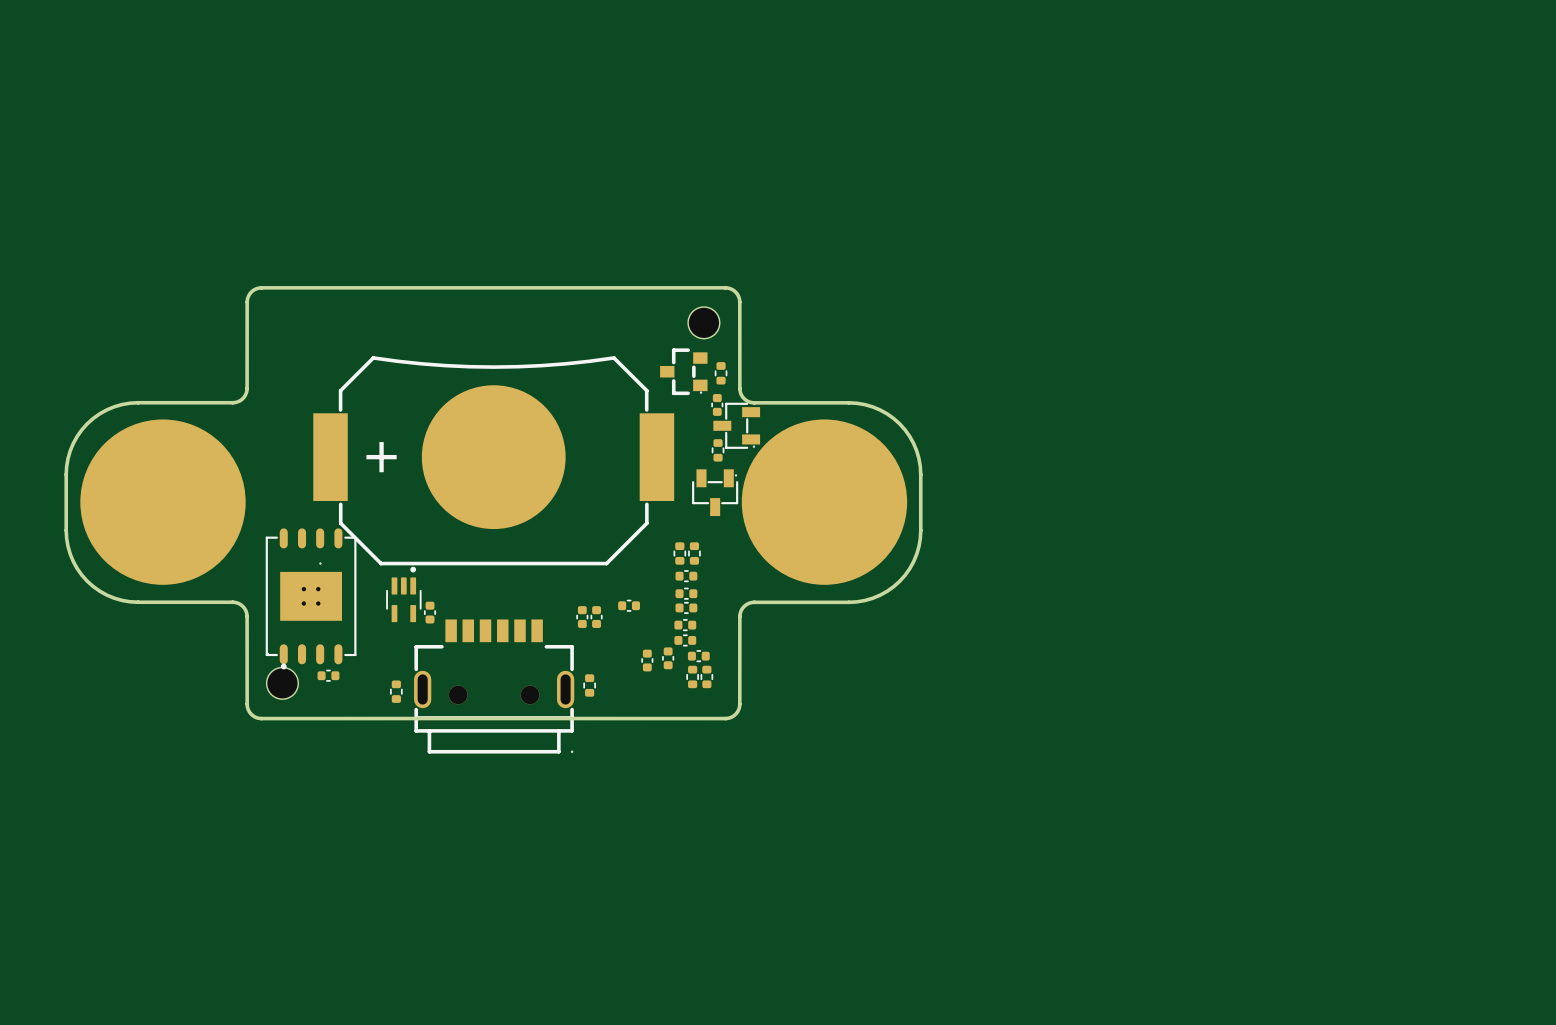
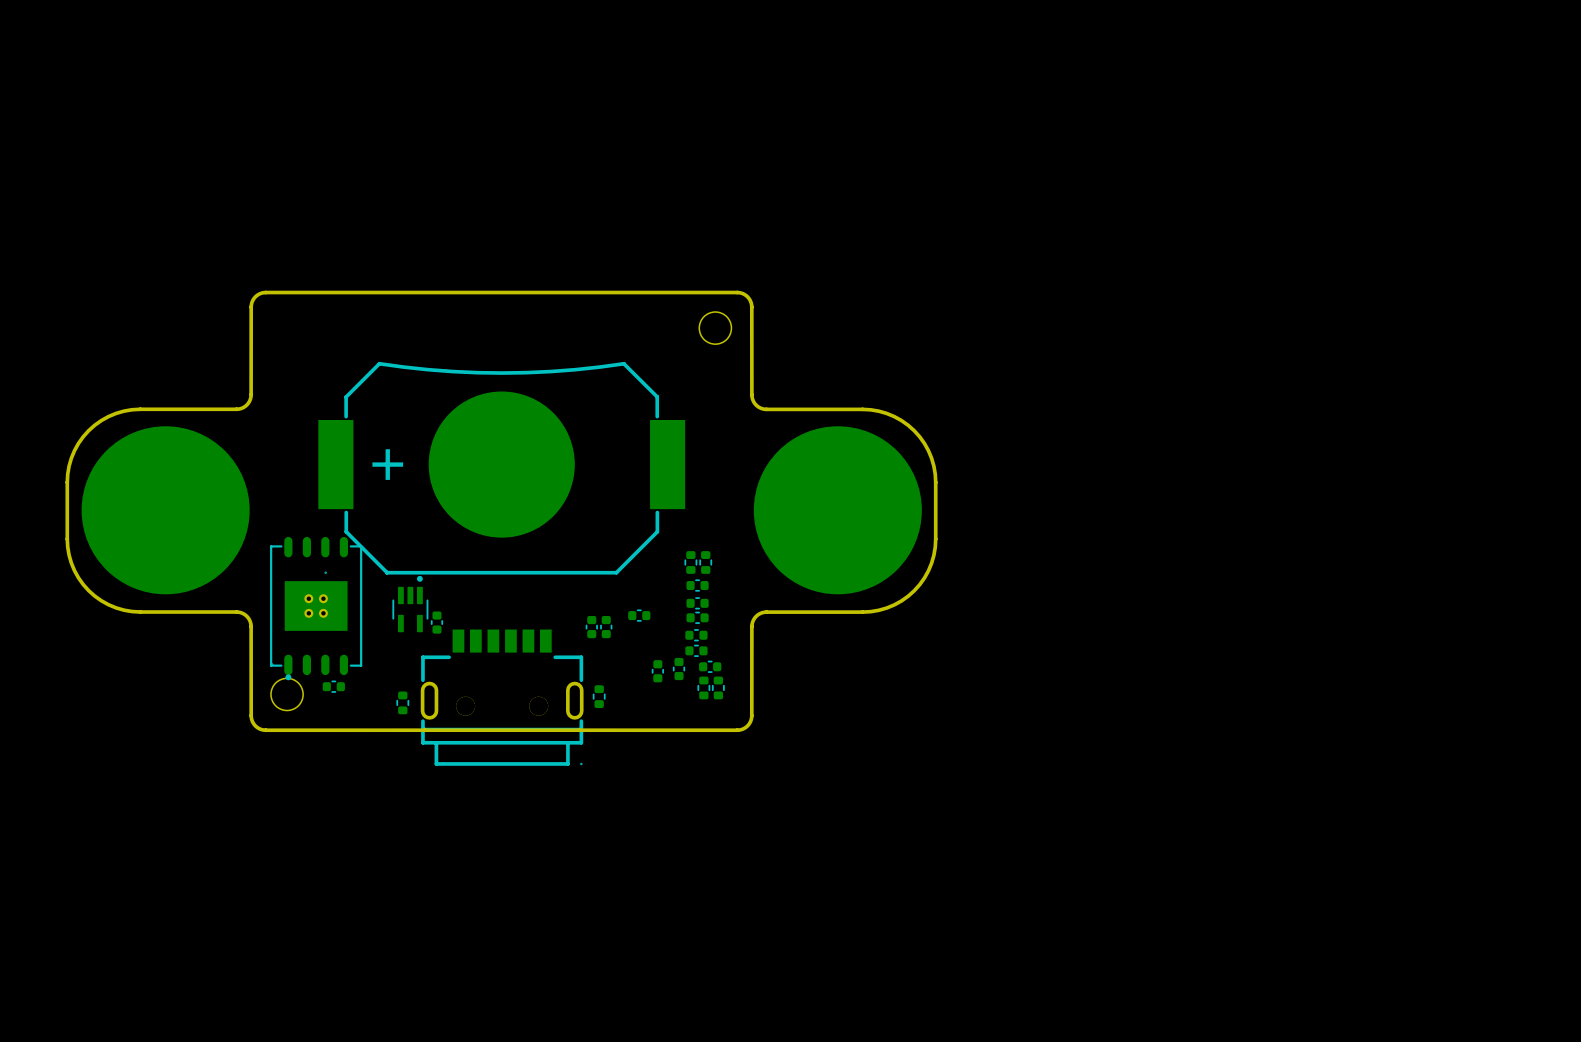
part: (683, 371) -> none
part: (721, 373) -> none
part: (717, 404) -> none
part: (736, 425) -> none
part: (718, 450) -> none
part: (715, 492) -> none

